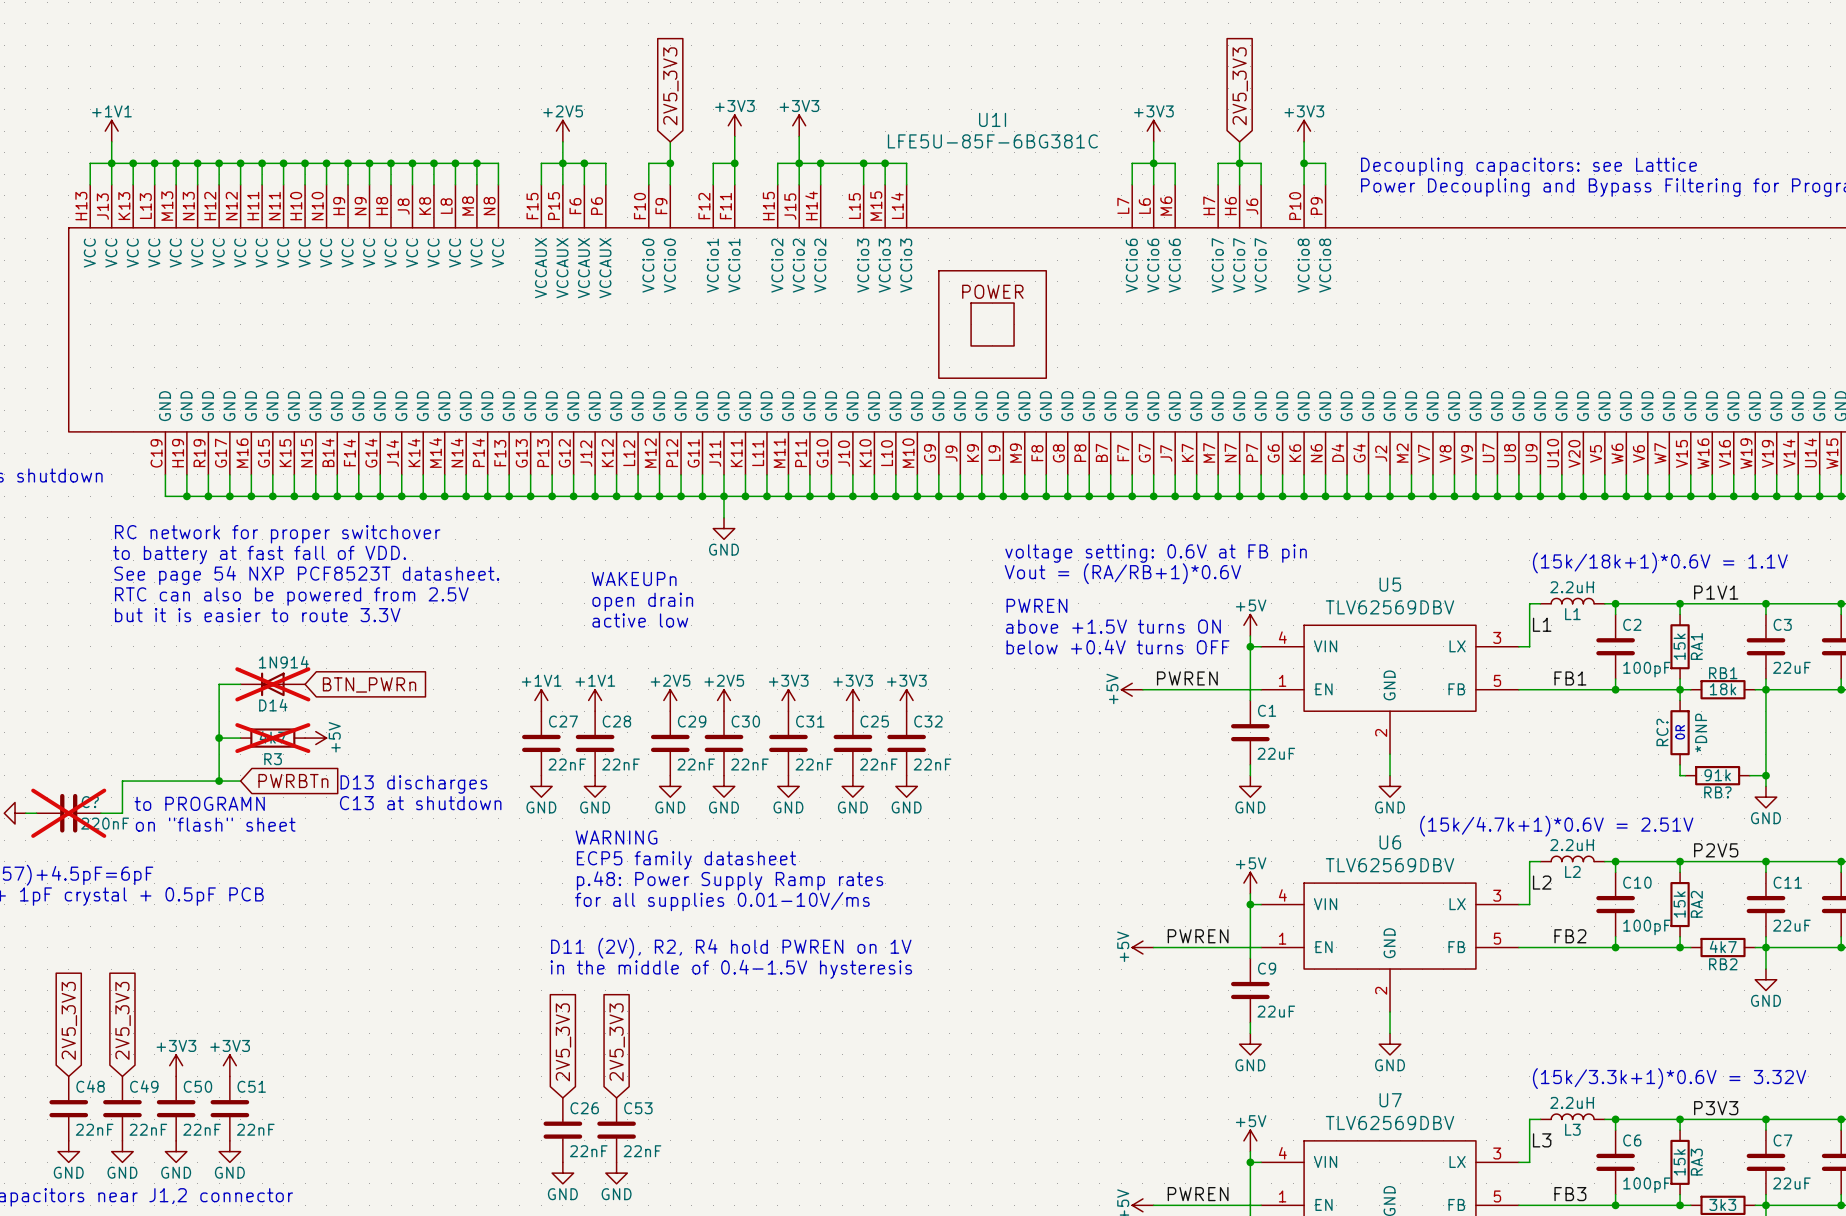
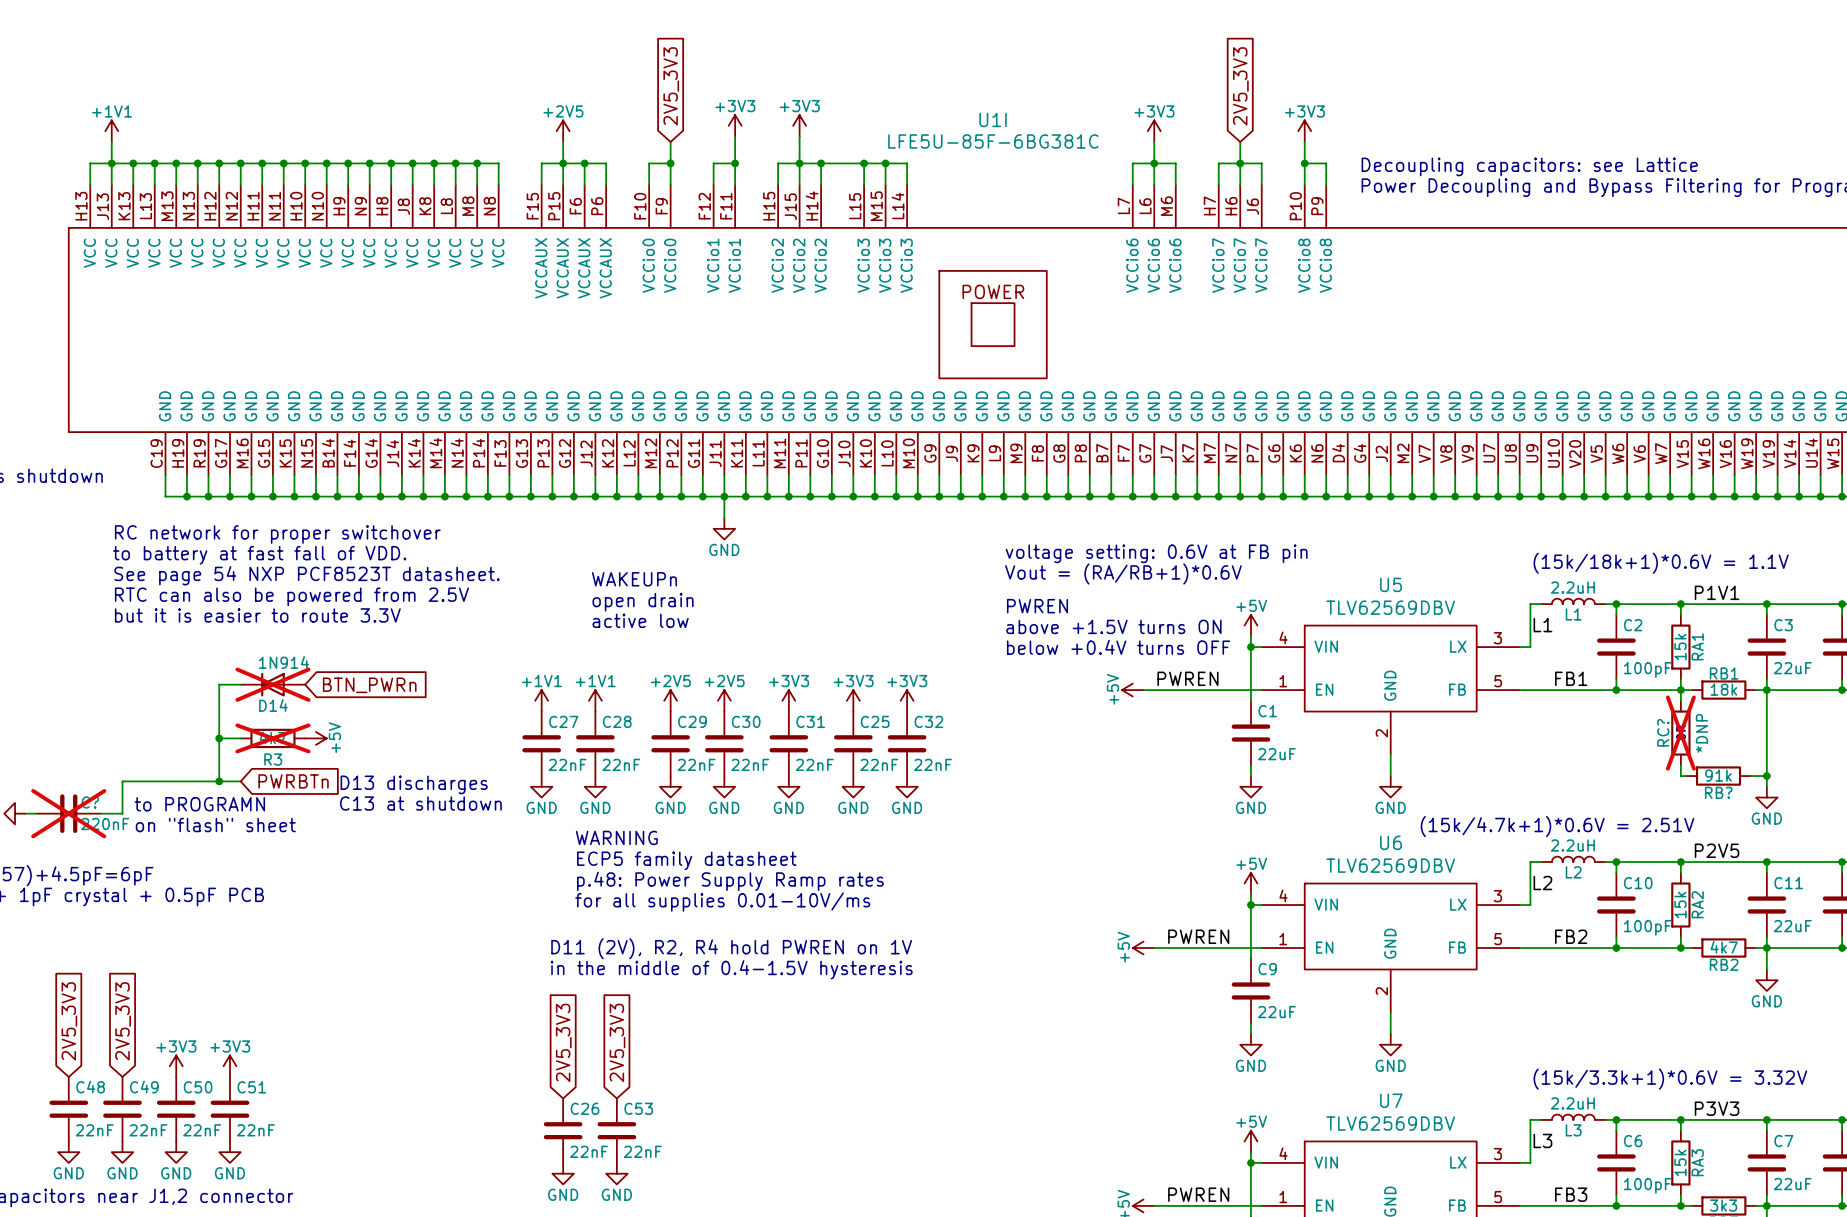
RC? do-not-place cross: none -> (1680, 733)

